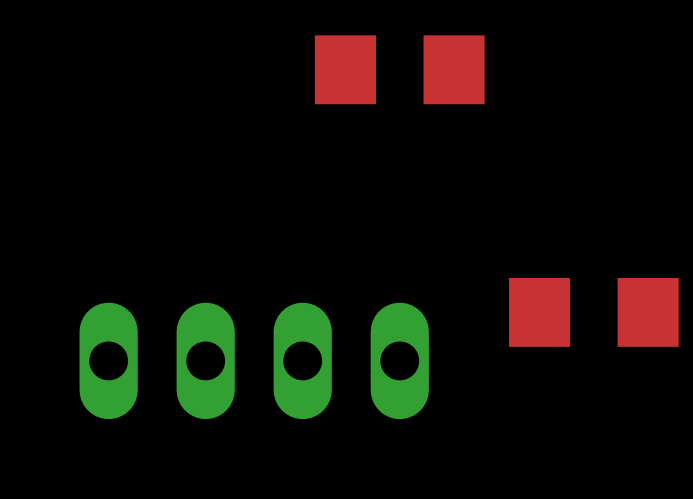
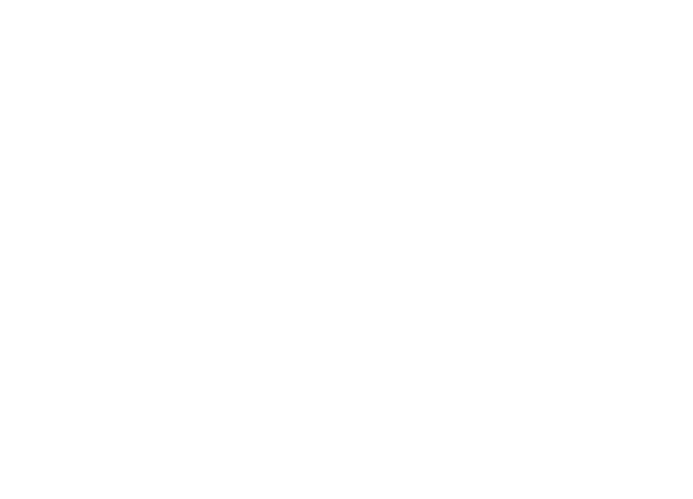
part: (399, 69) -> none
part: (593, 312) -> none
part: (254, 360) -> none

